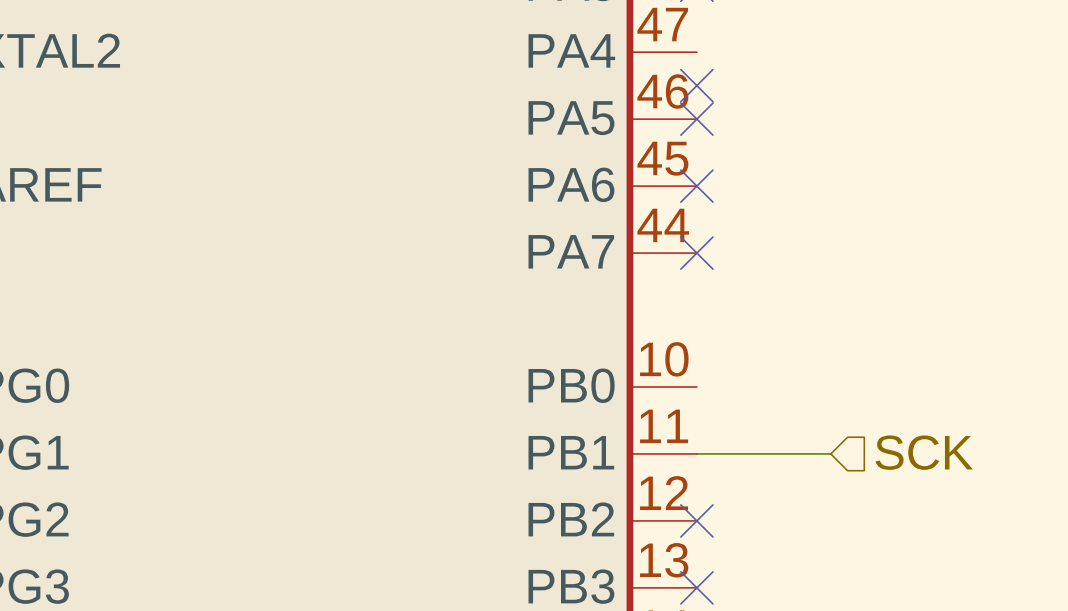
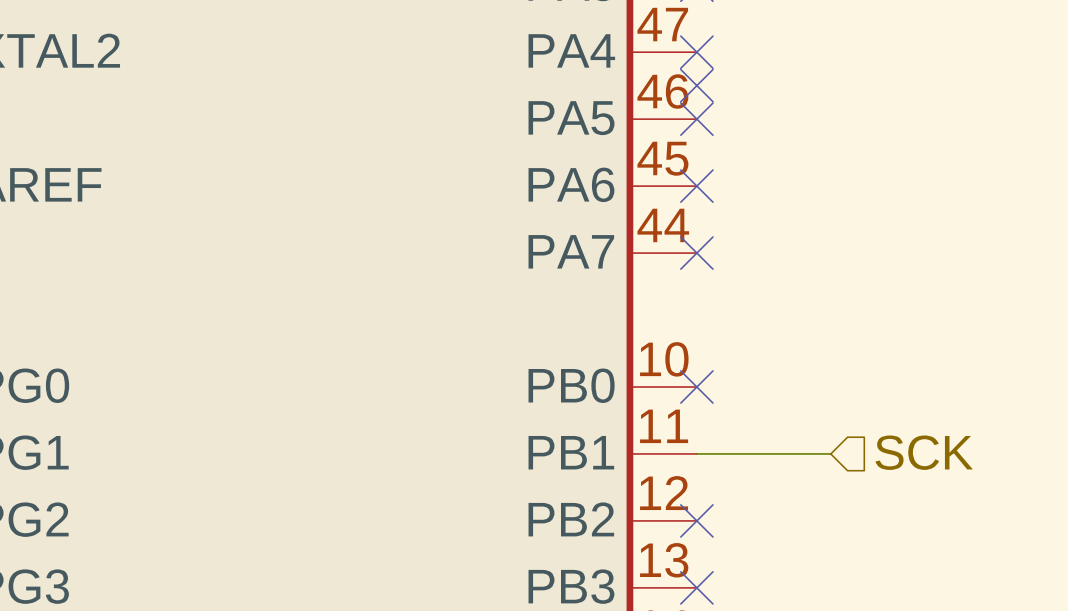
no-connect mark: none -> (696, 52)
no-connect mark: none -> (696, 387)

